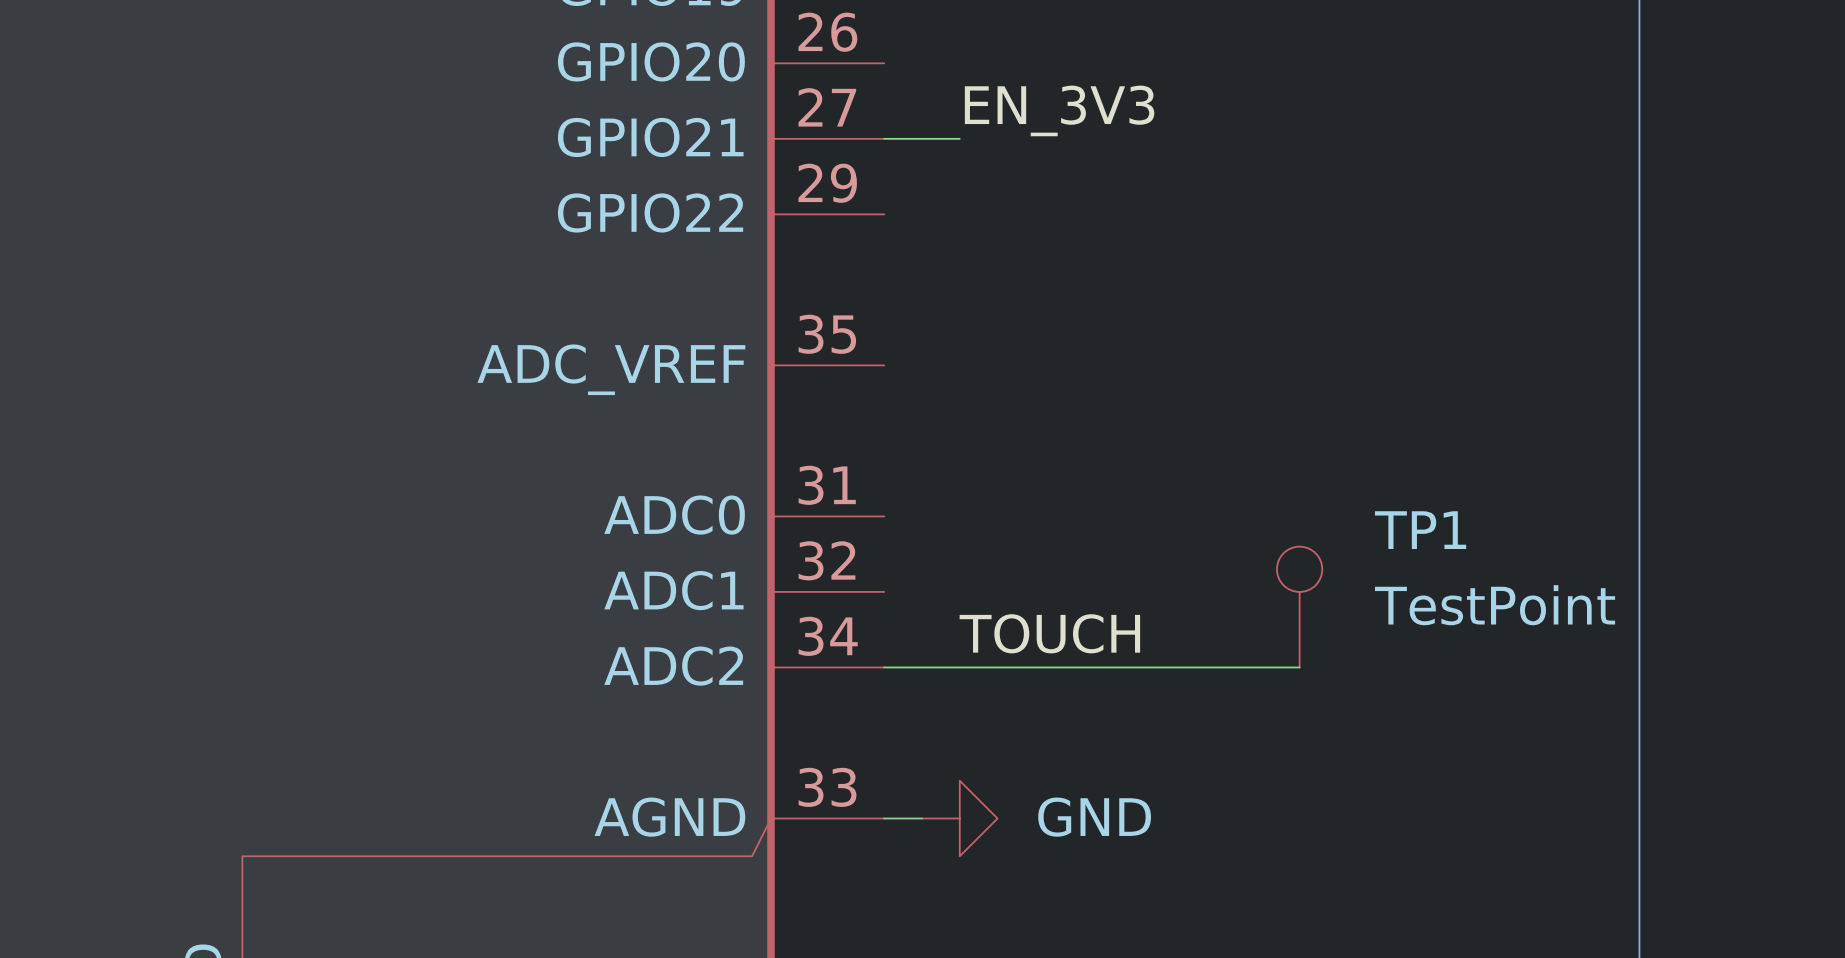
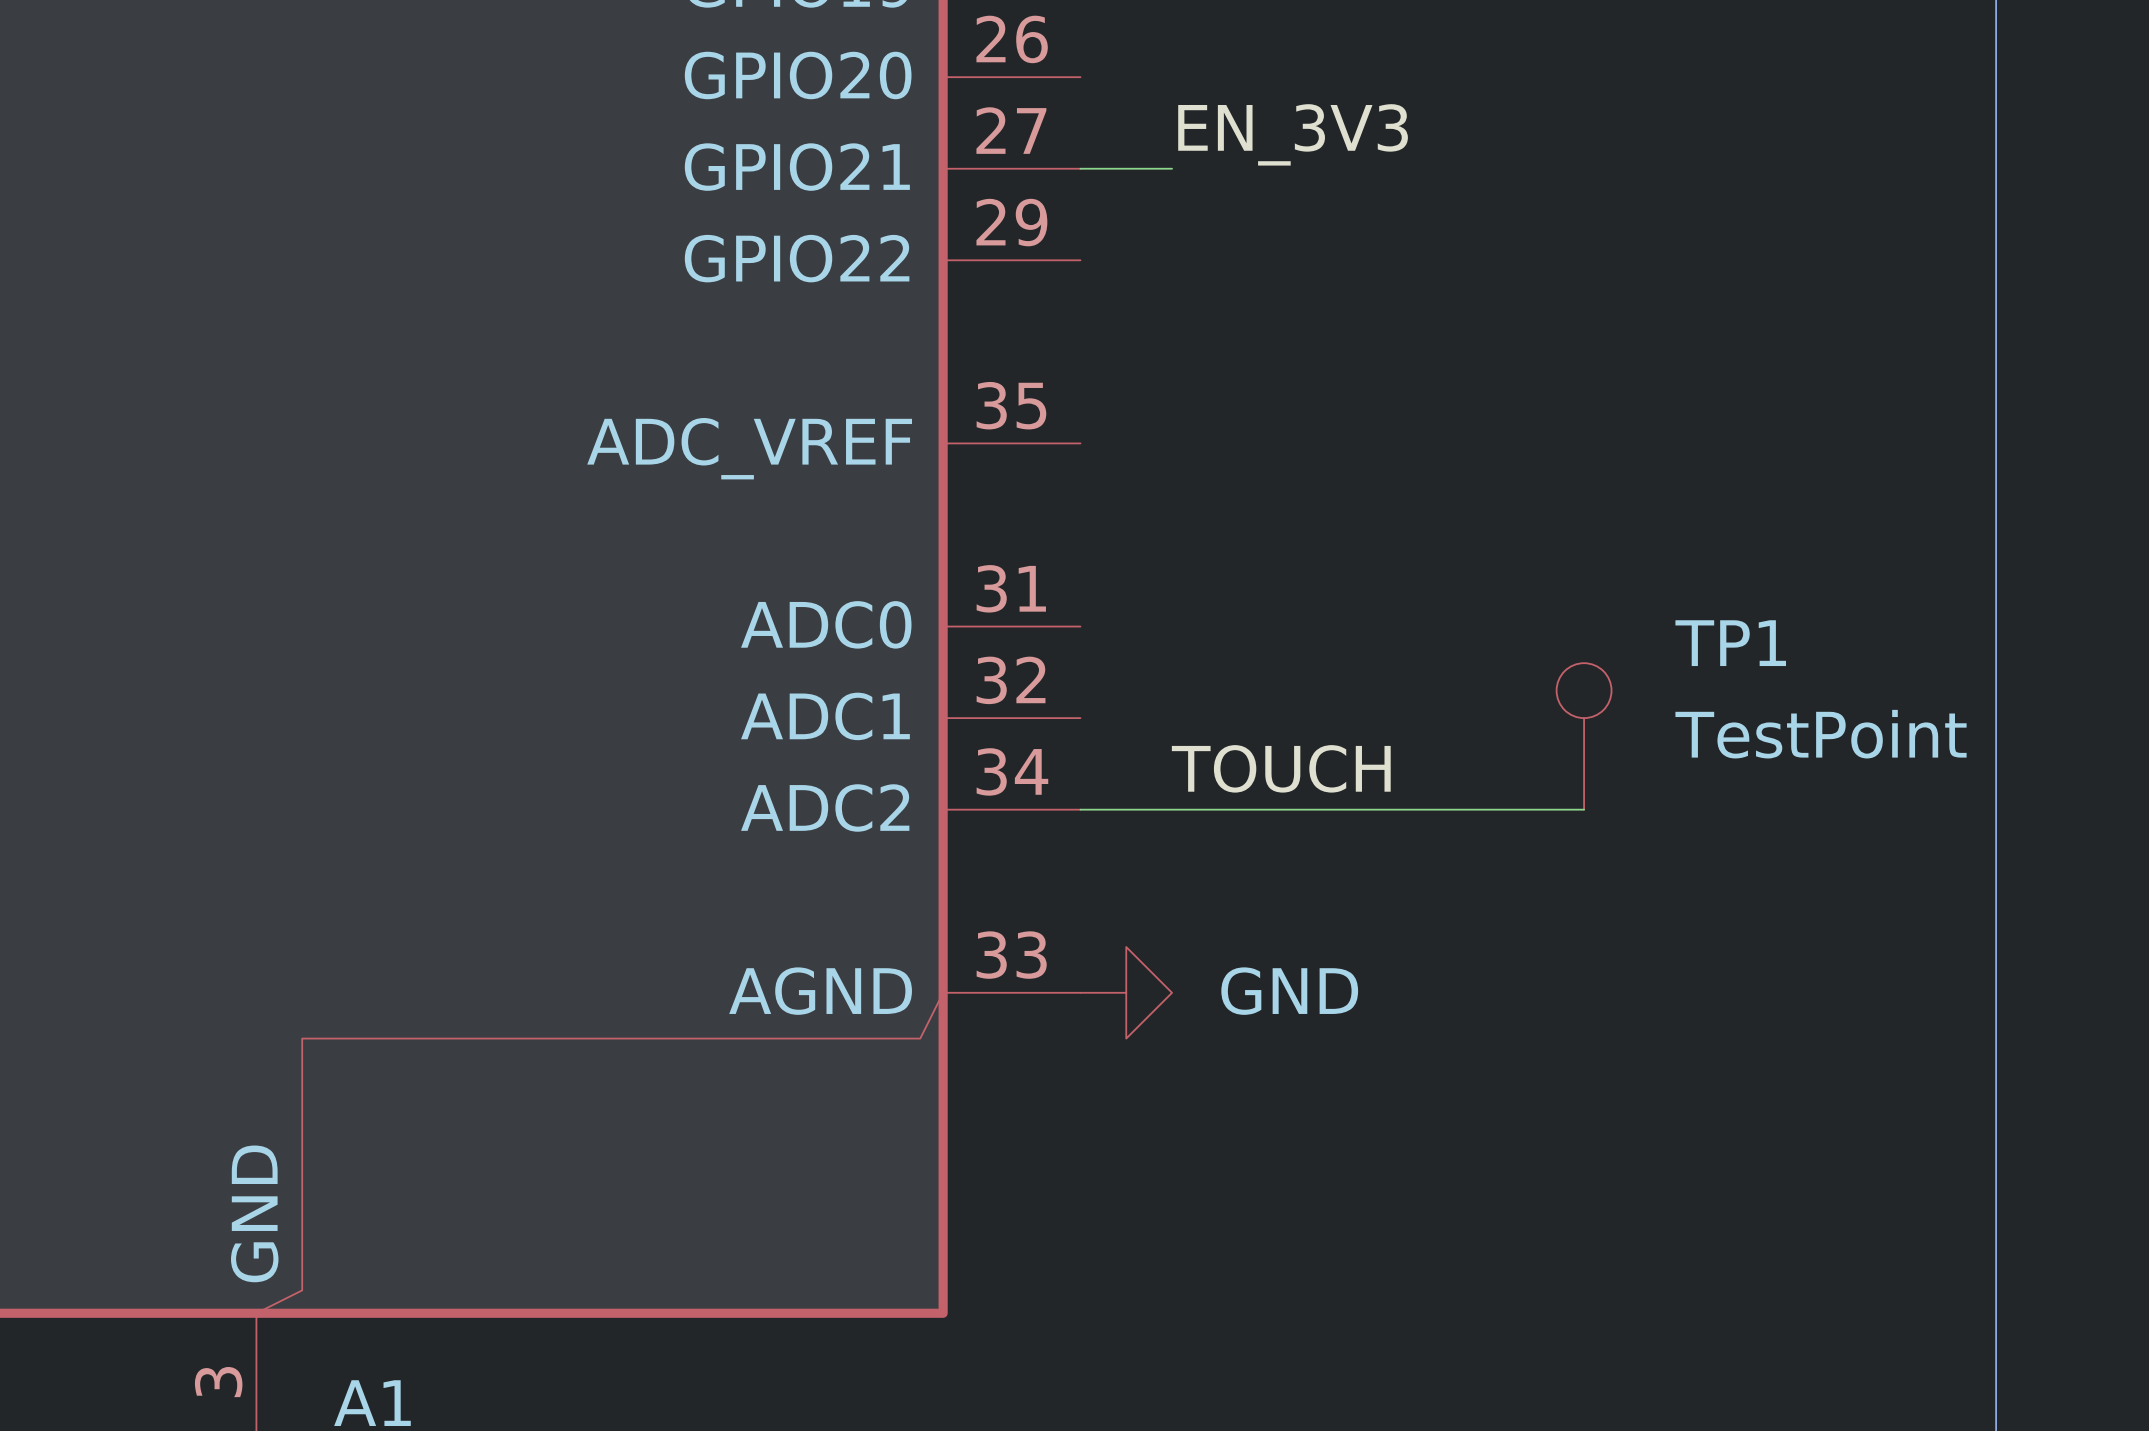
power symbol position: GND (959, 818) -> GND (1126, 992)

